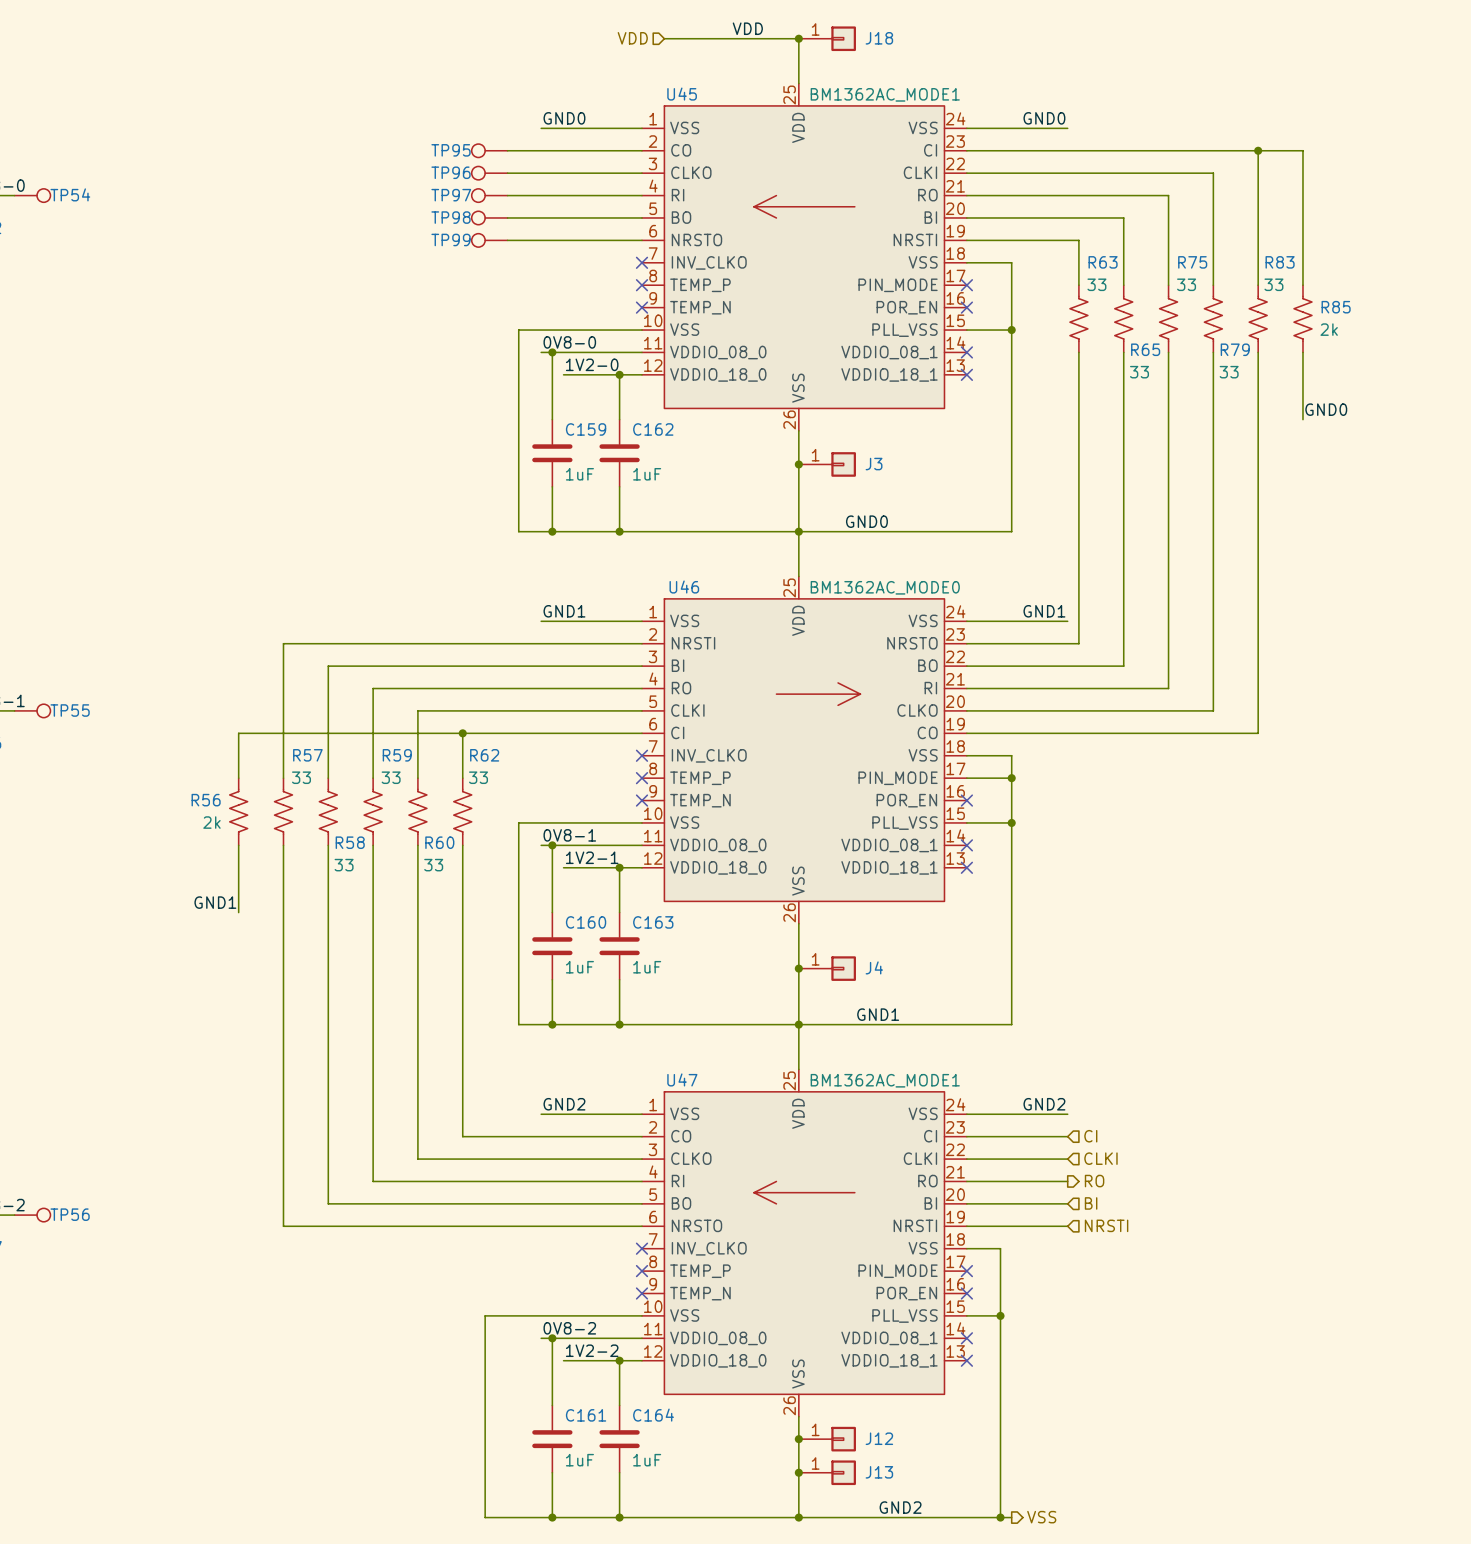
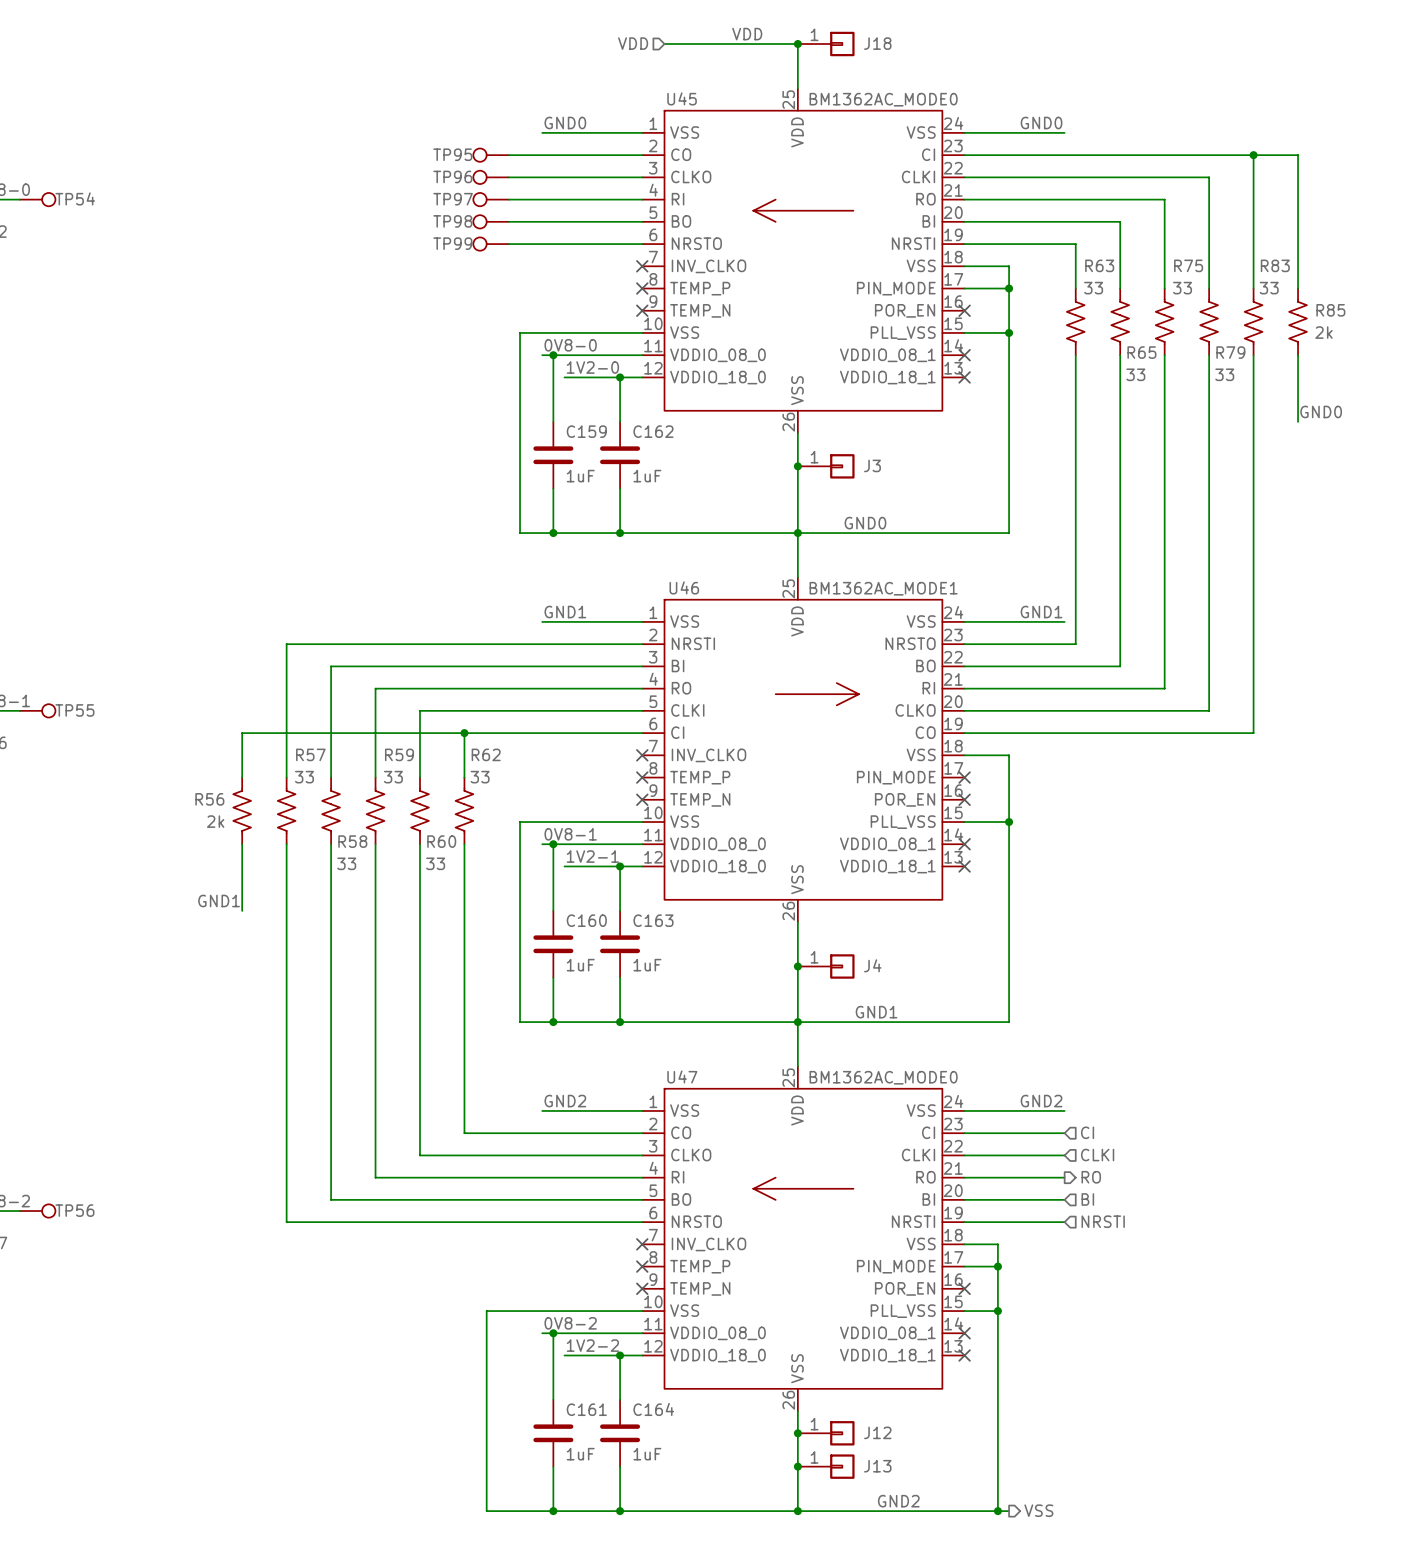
U45 value: BM1362AC_MODE1 (885, 94) -> BM1362AC_MODE0 (883, 99)
wire: none -> (964, 288) (1009, 288)
no-connect mark: (966, 285) -> none
junction: none -> (1009, 288)
U46 value: BM1362AC_MODE0 (885, 587) -> BM1362AC_MODE1 (883, 588)
wire: (966, 778) (1011, 778) -> none
no-connect mark: none -> (964, 777)
junction: (1011, 778) -> none
U47 value: BM1362AC_MODE1 (885, 1080) -> BM1362AC_MODE0 (883, 1077)
wire: none -> (964, 1266) (997, 1266)
no-connect mark: (966, 1271) -> none
junction: none -> (997, 1266)

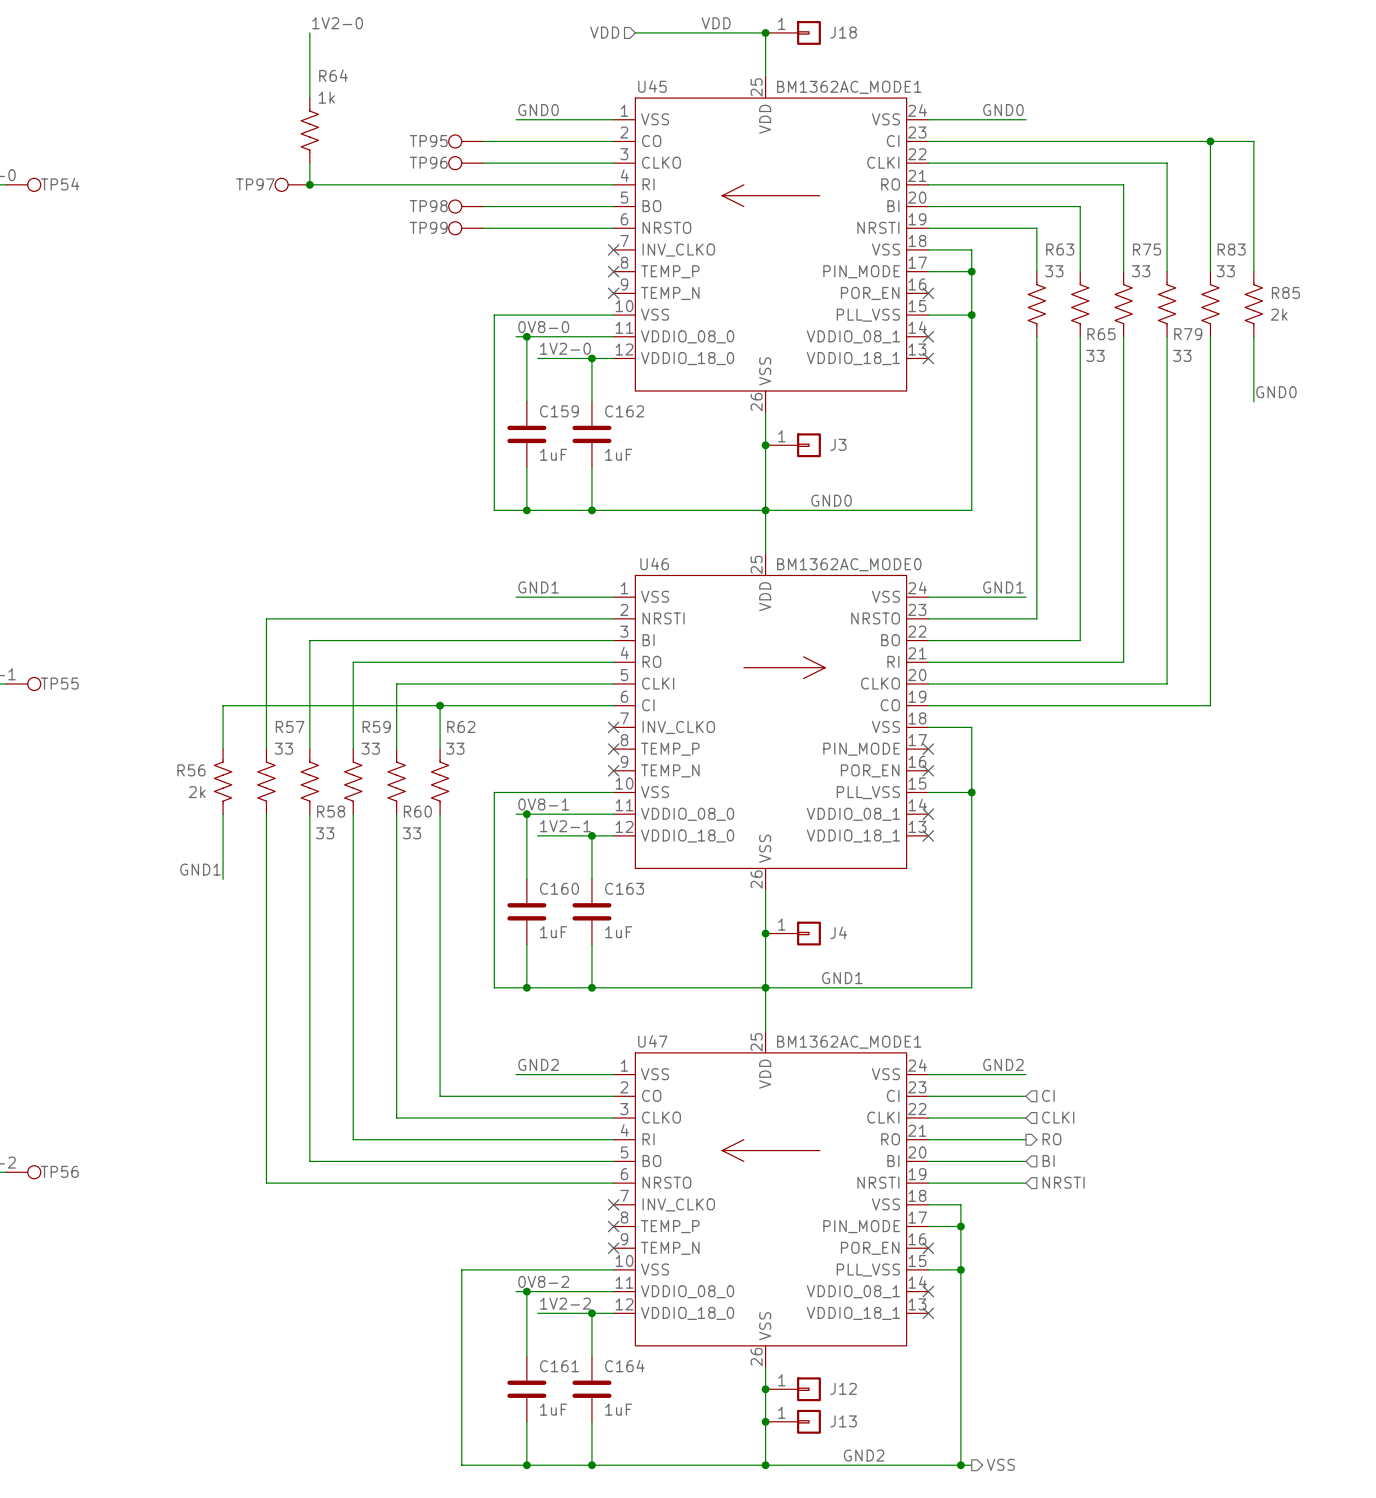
label: none -> 1V2-0 (337, 23)
wire: none -> (309, 32) (309, 98)
U45 value: BM1362AC_MODE0 (883, 99) -> BM1362AC_MODE1 (849, 87)
R64: none -> 1k (309, 130)
wire: none -> (309, 163) (309, 184) (483, 184)
junction: none -> (309, 184)
TP97 position: (491, 199) -> (292, 184)
U46 value: BM1362AC_MODE1 (883, 588) -> BM1362AC_MODE0 (849, 564)
U47 value: BM1362AC_MODE0 (883, 1077) -> BM1362AC_MODE1 (849, 1042)

